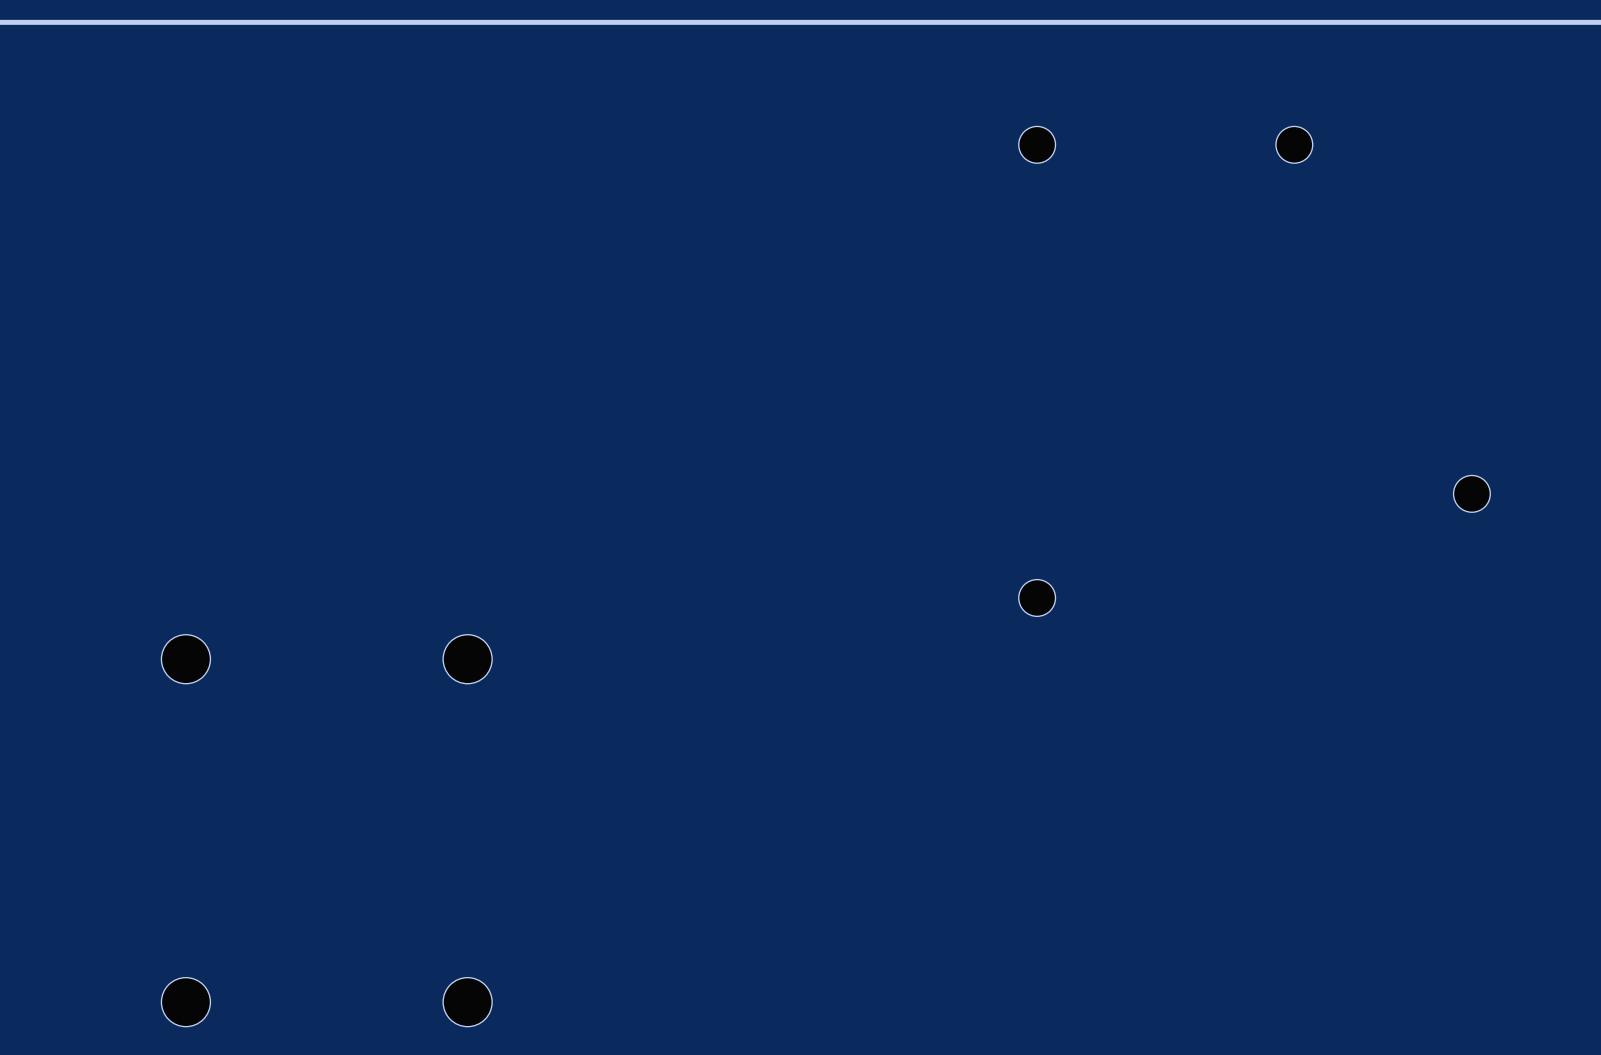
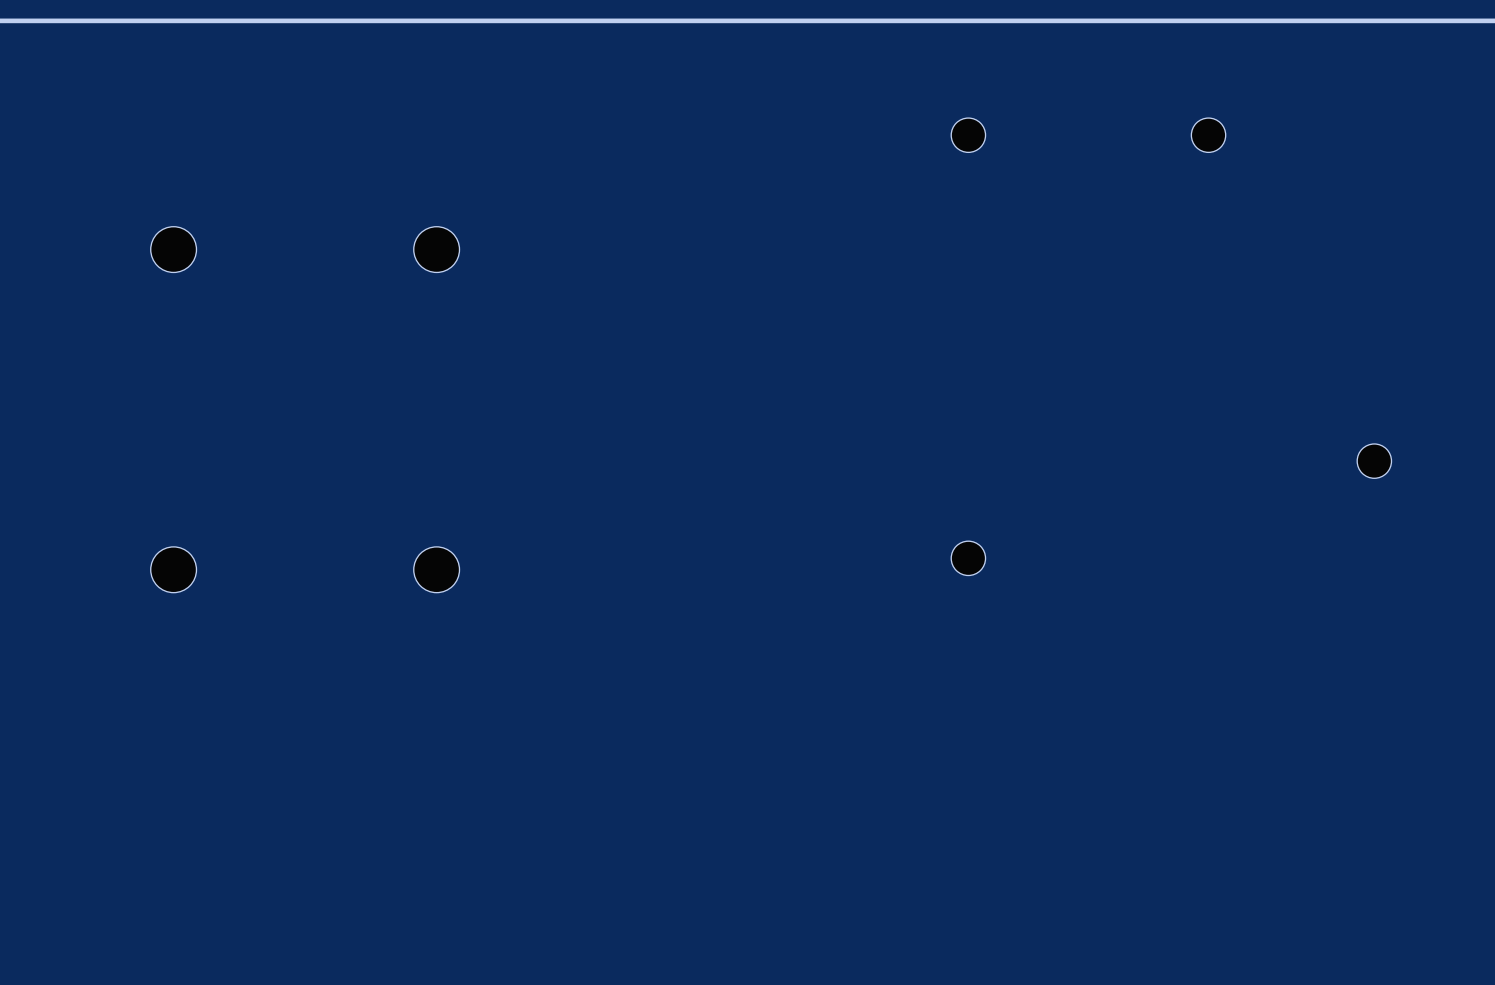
hole: none -> (173, 249)
hole: none -> (436, 249)
hole position: (185, 659) -> (173, 569)
hole position: (467, 659) -> (436, 569)
hole: (185, 1002) -> none
hole: (467, 1002) -> none

